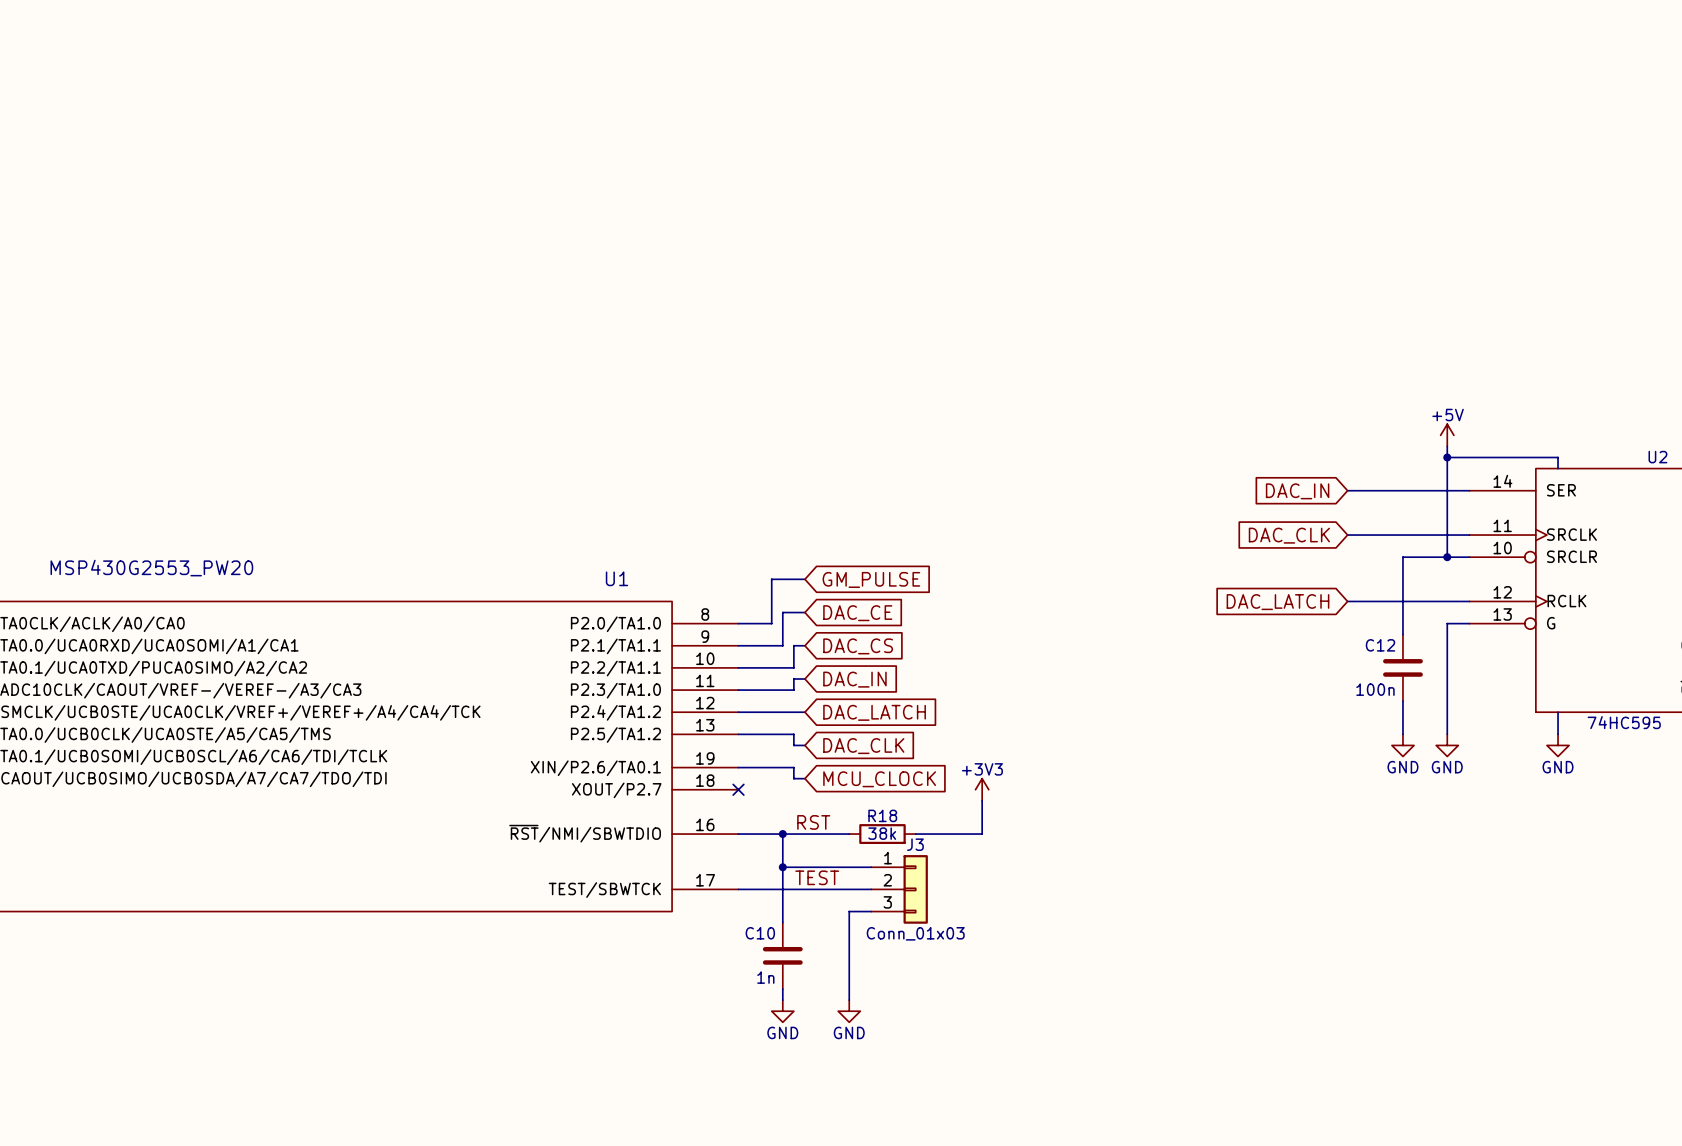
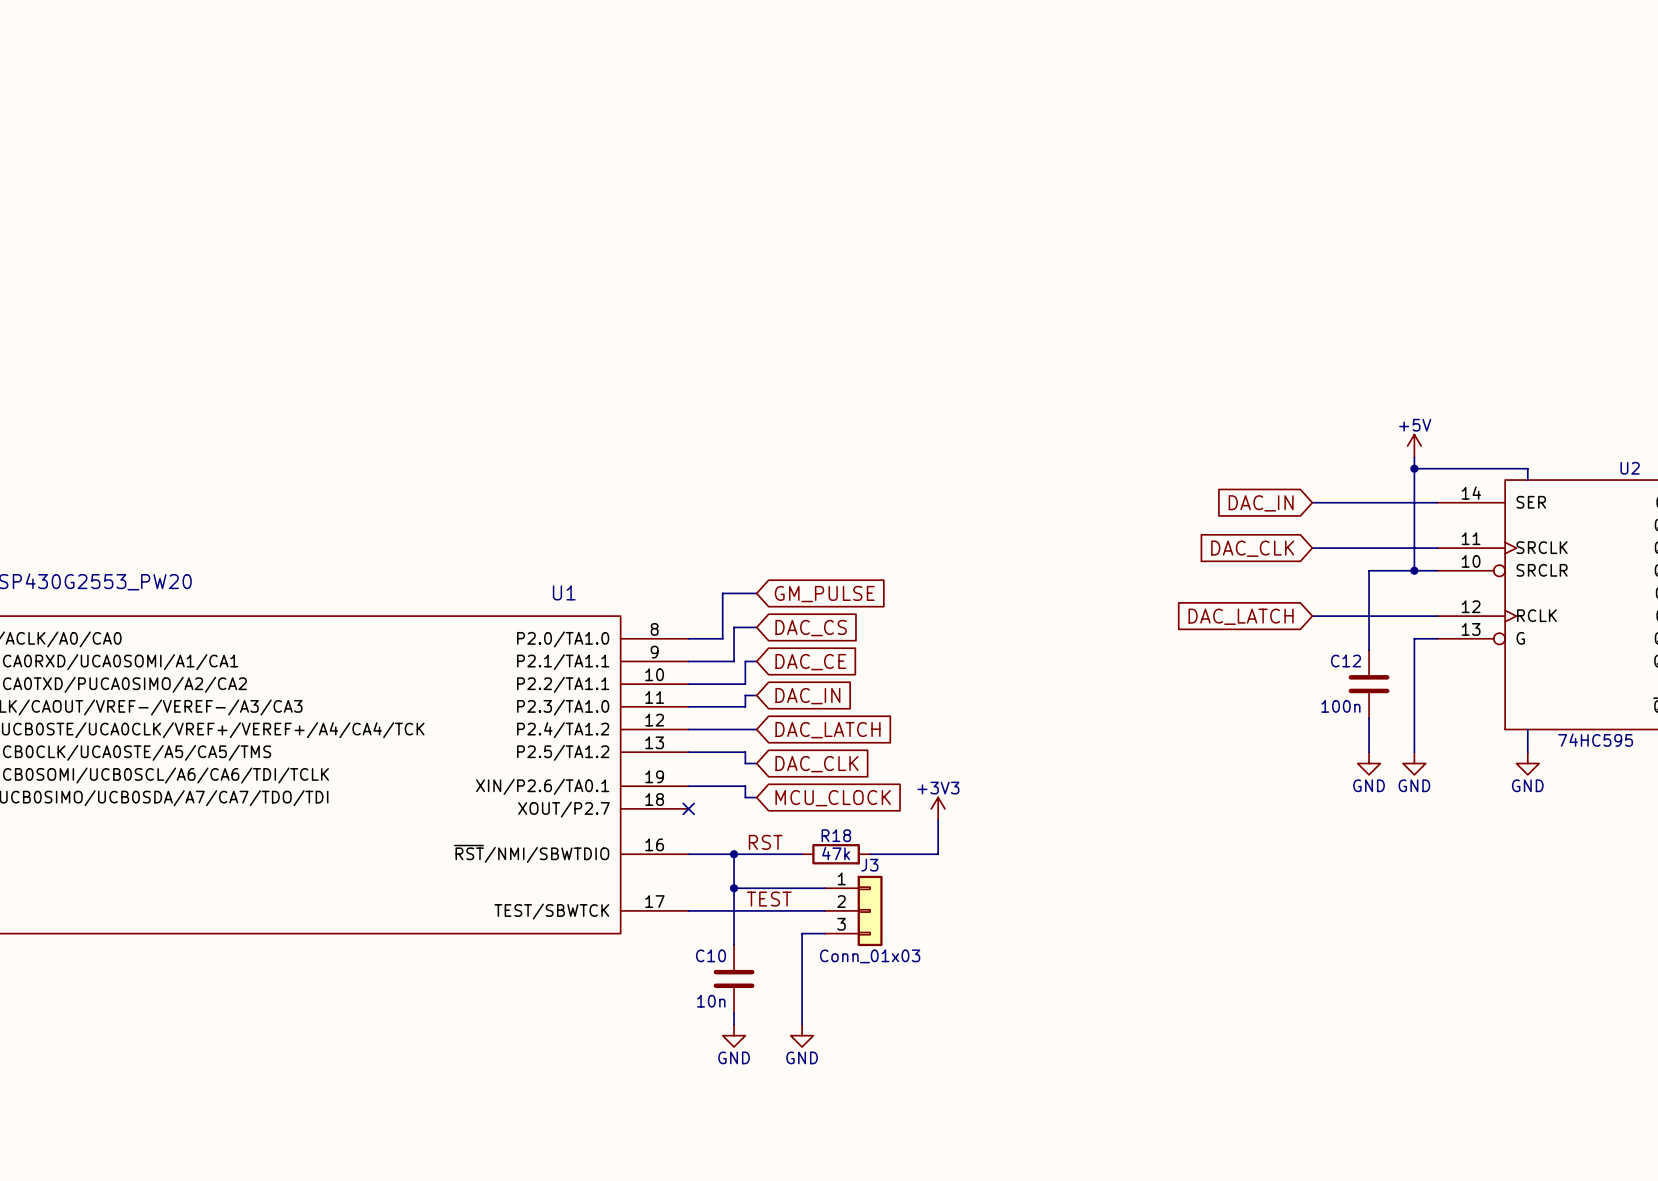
global label: DAC_CE (857, 613) -> DAC_CS (811, 628)
global label: DAC_CS (858, 646) -> DAC_CE (810, 662)
R18 value: 38k (882, 833) -> 47k (836, 853)
C10 value: 1n (765, 977) -> 10n (711, 1001)

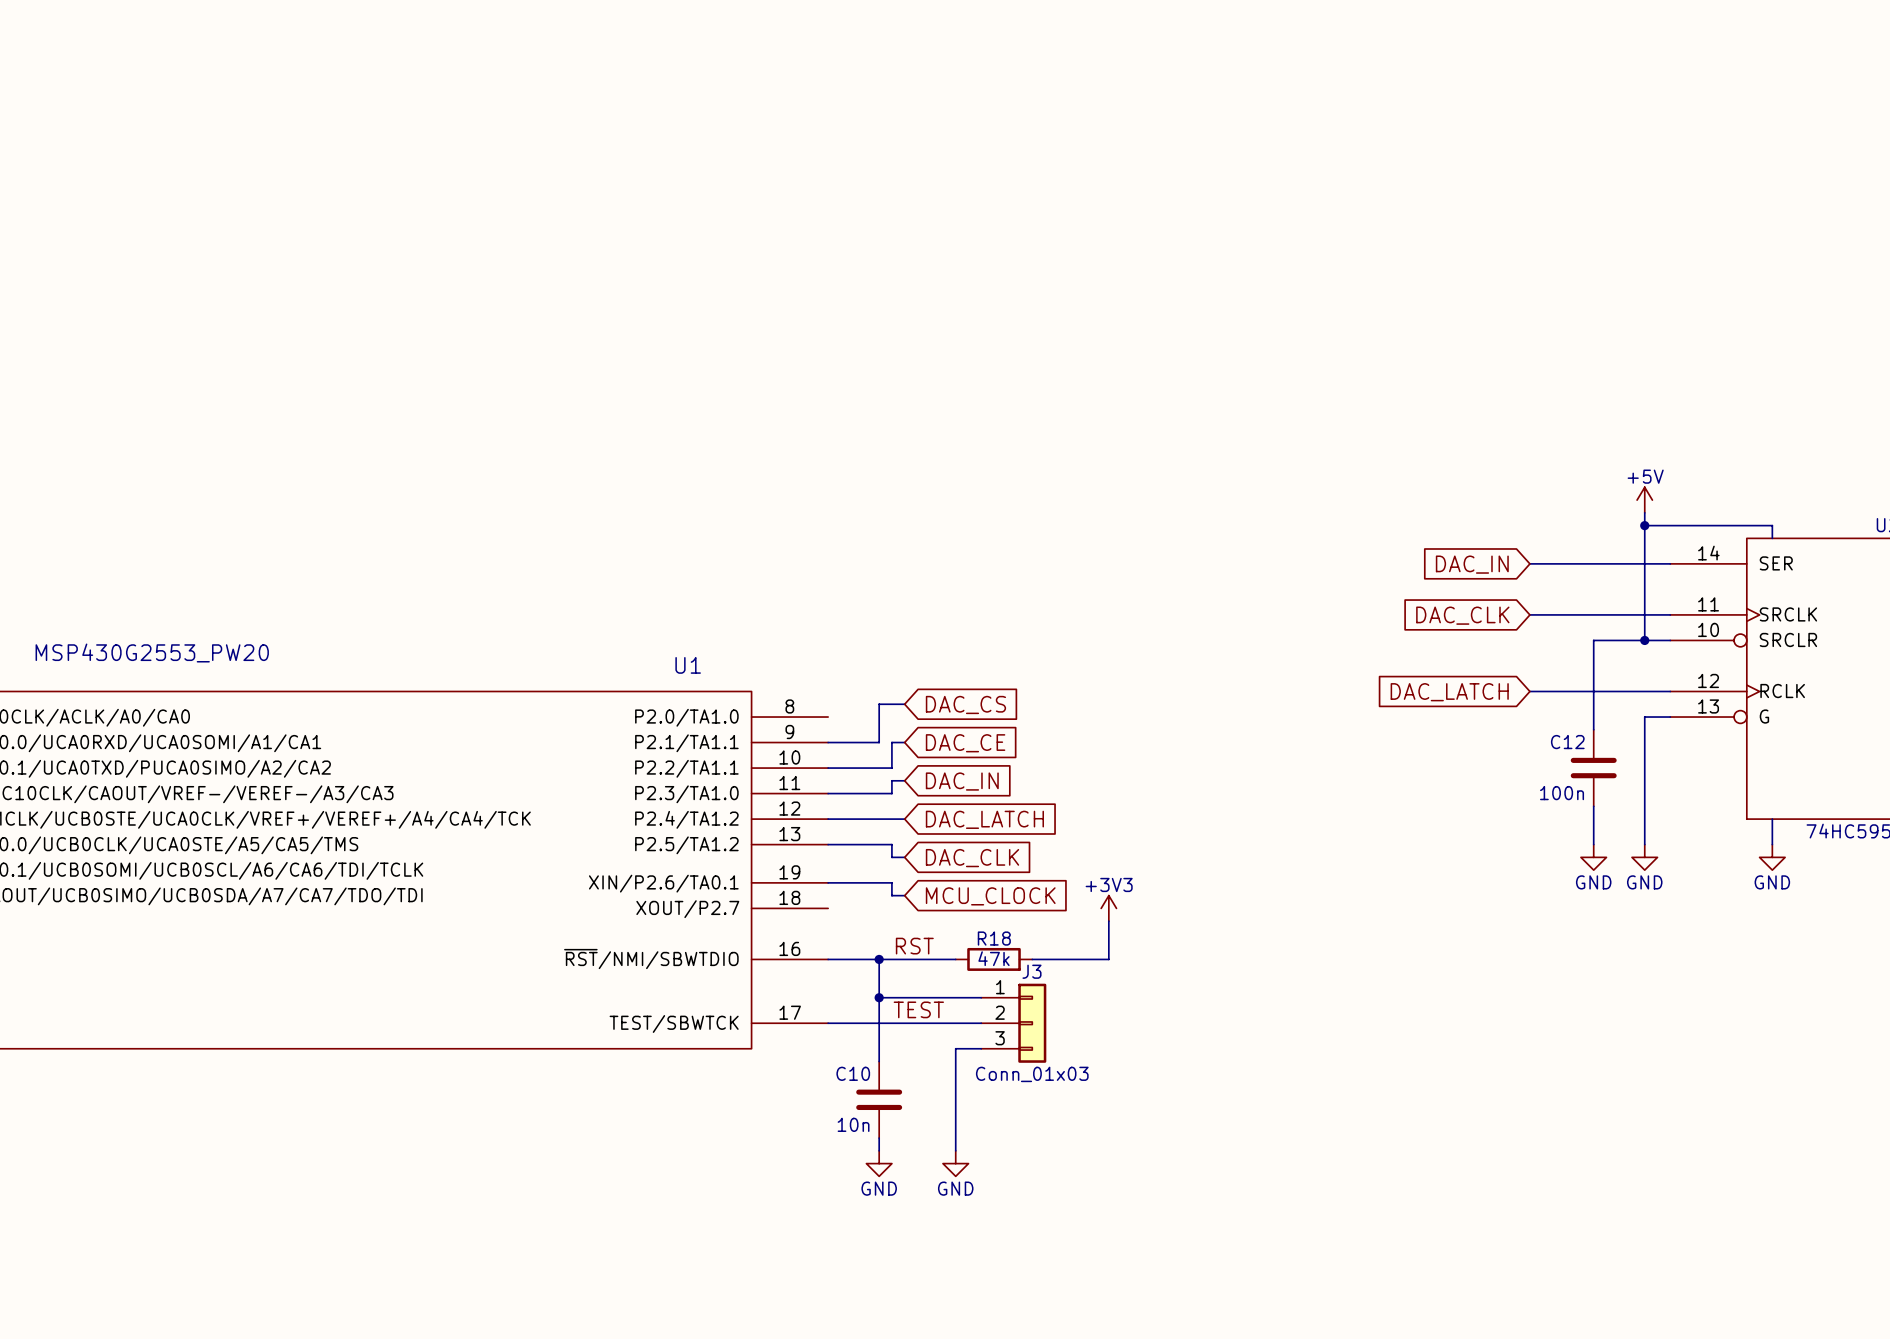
wire: (756, 593) (722, 593) (722, 638) (688, 638) -> none
global label: GM_PULSE (824, 594) -> none
no-connect mark: (688, 808) -> none

